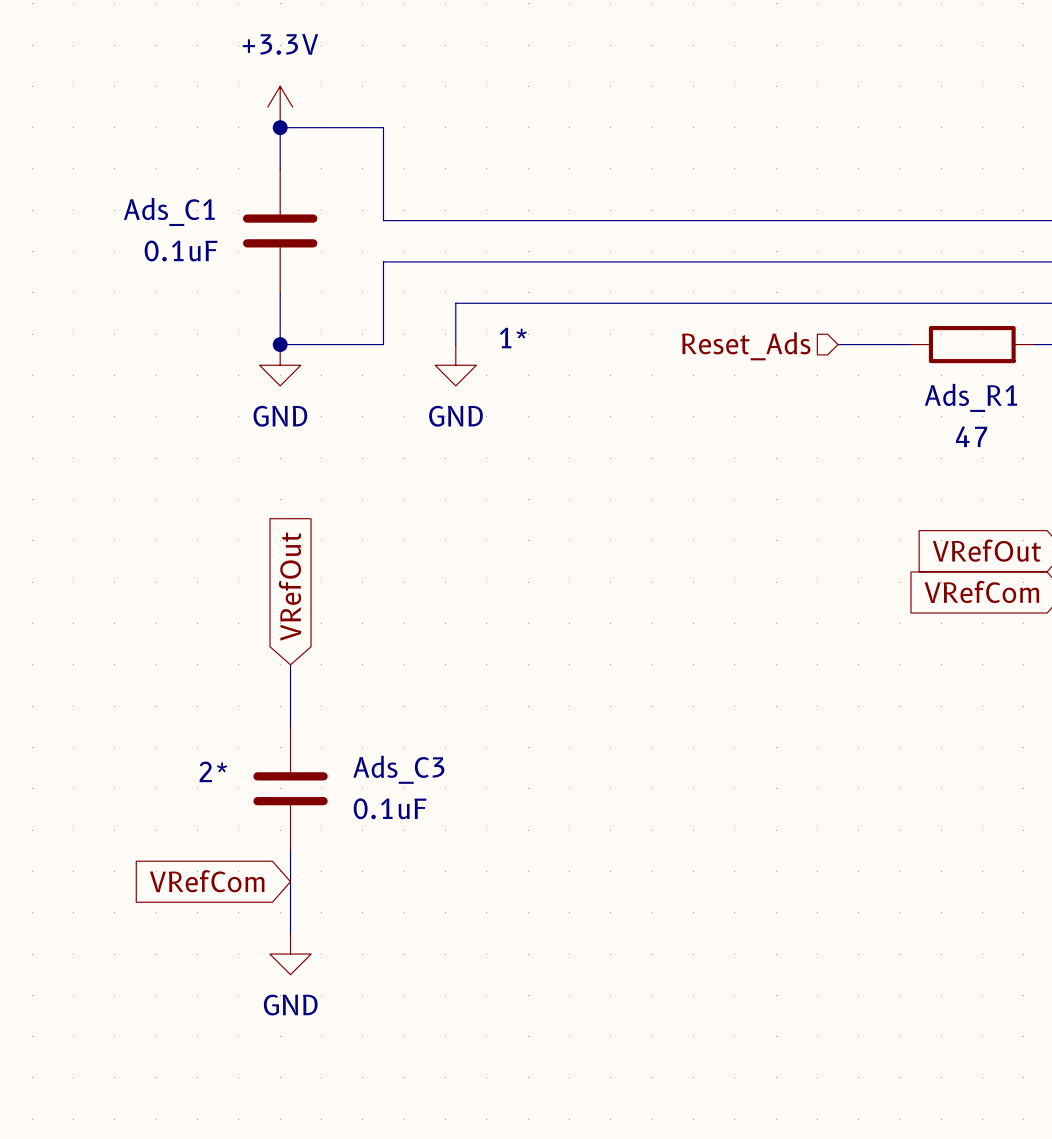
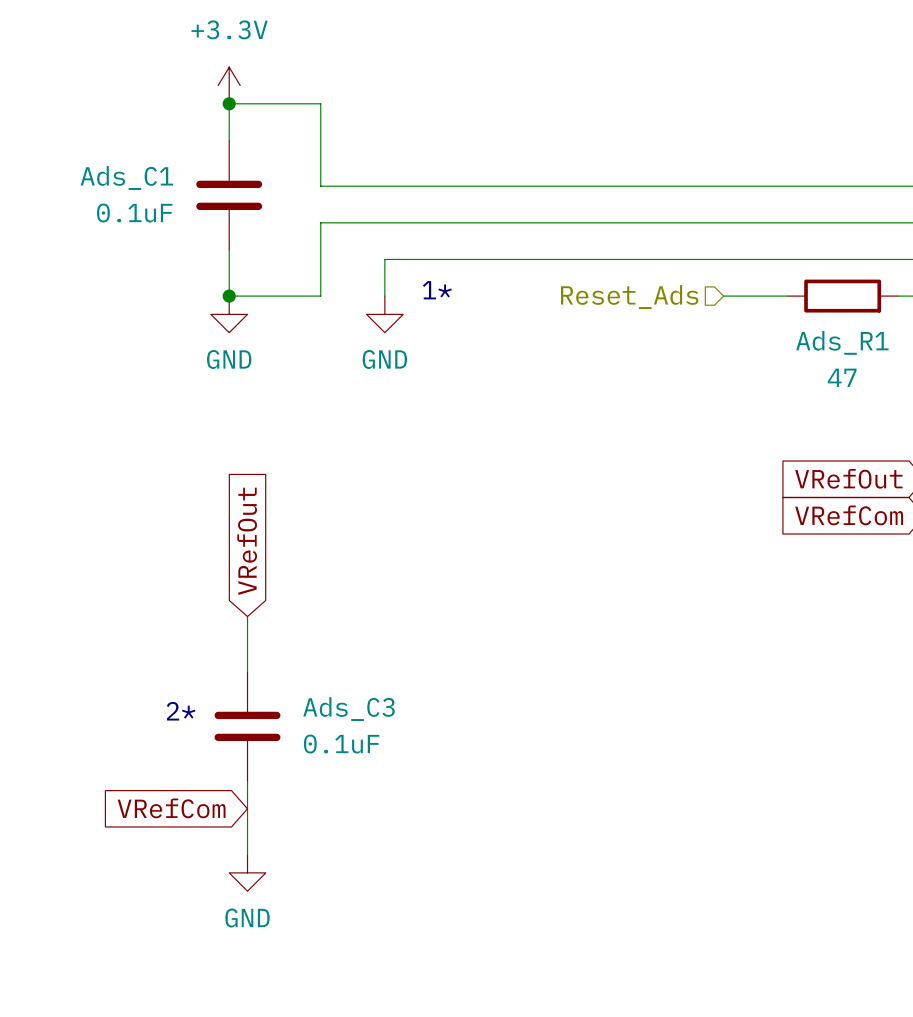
global label position: VRefOut (290, 586) -> VRefOut (247, 541)
wire: (290, 664) (290, 726) -> (247, 616) (247, 671)
text position: 2* (213, 771) -> 2* (181, 711)
Ads_C3 position: (290, 788) -> (247, 726)
wire: (290, 850) (290, 933) -> (247, 781) (247, 854)
global label position: VRefCom (207, 881) -> VRefCom (171, 808)
power symbol position: GND (290, 954) -> GND (247, 872)

